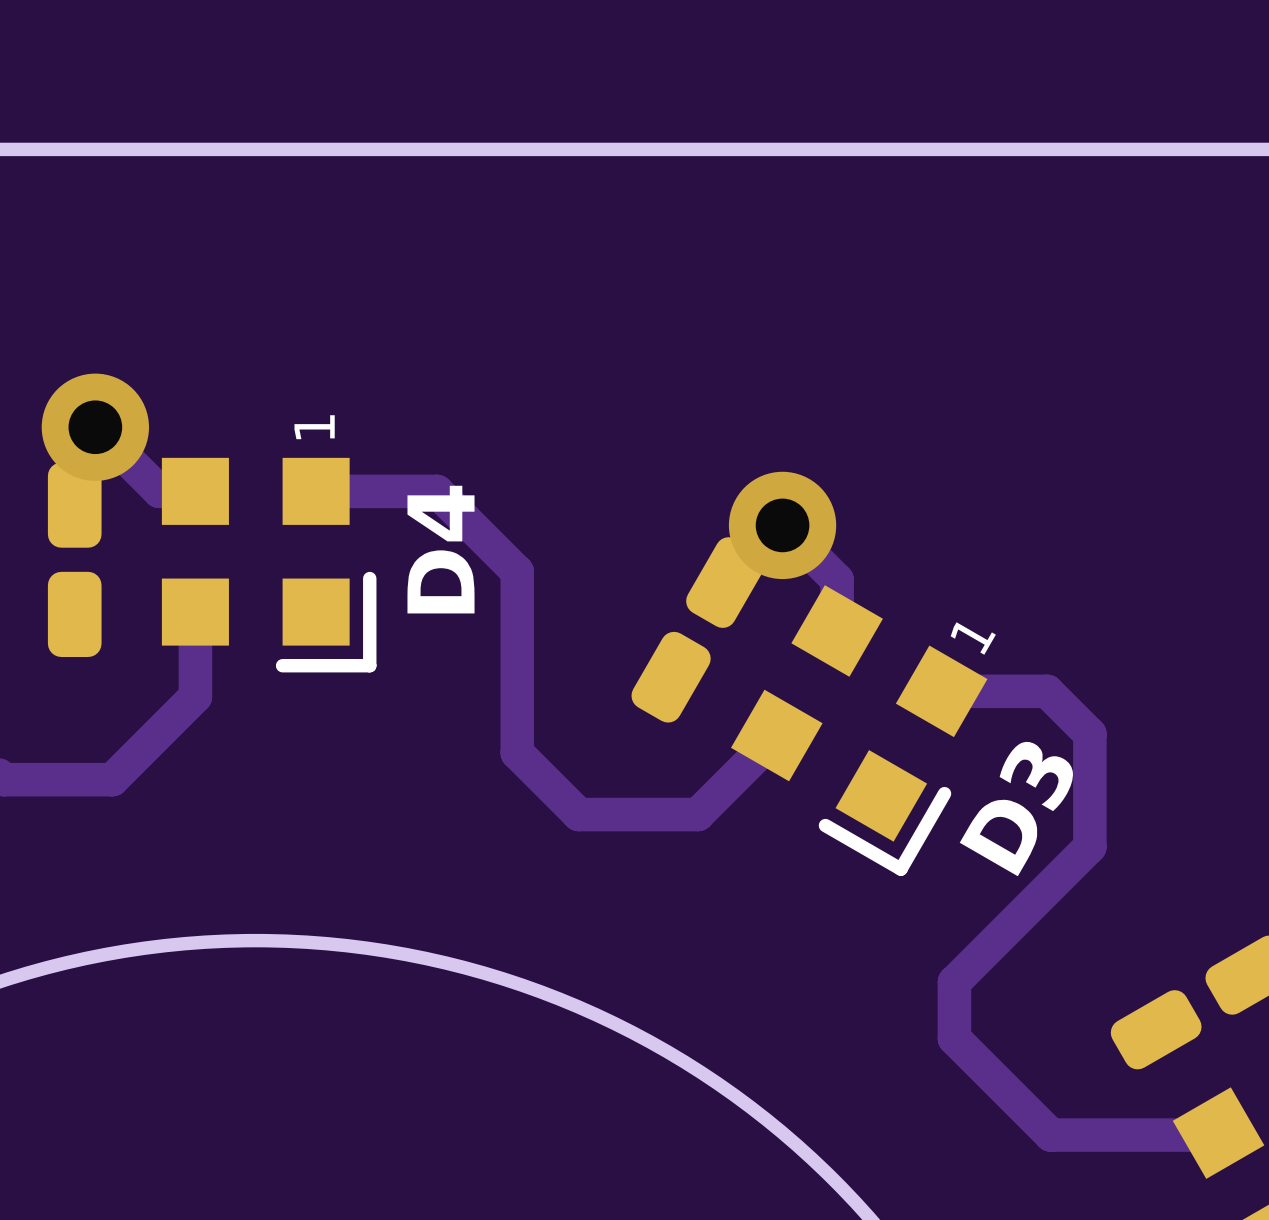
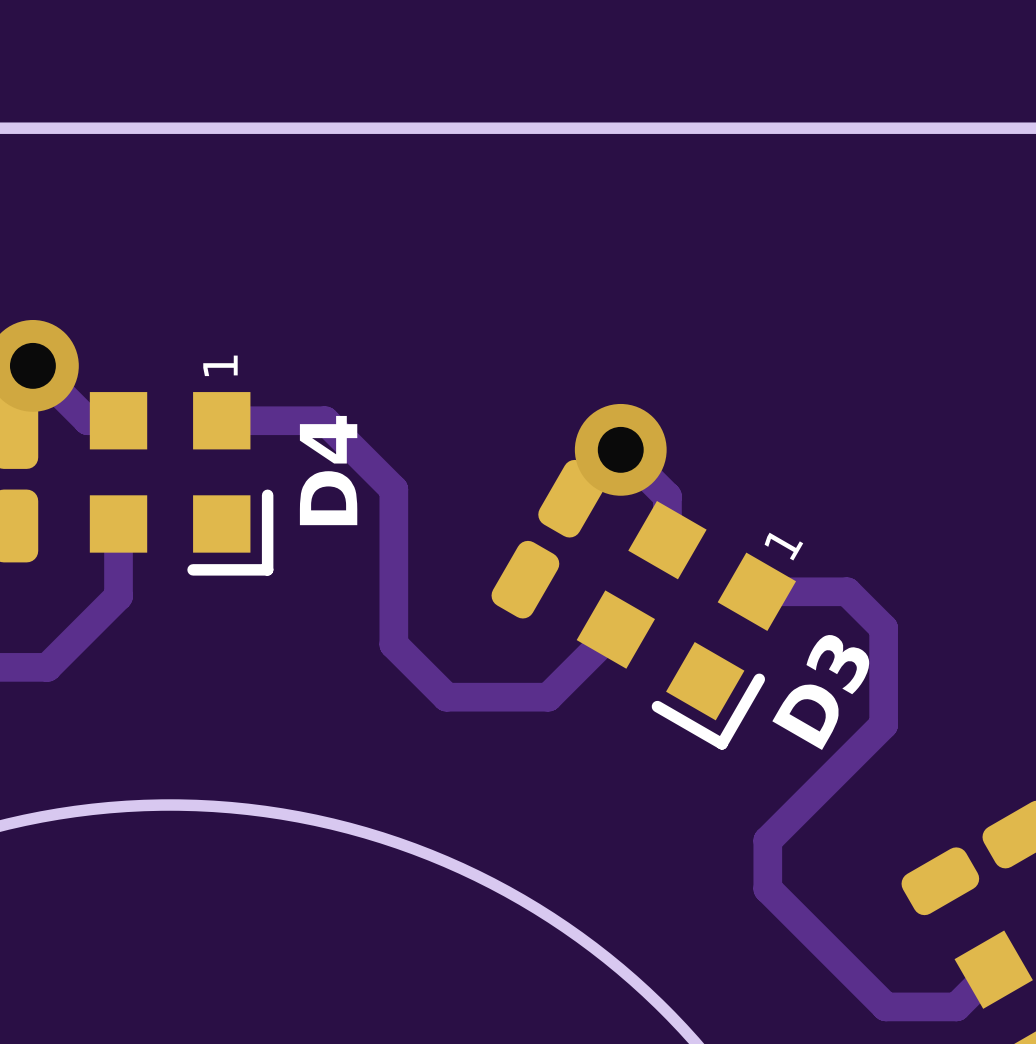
track: (1050, 1135) (1216, 1135) -> (850, 971) (885, 1006) (956, 1006) (992, 971)

